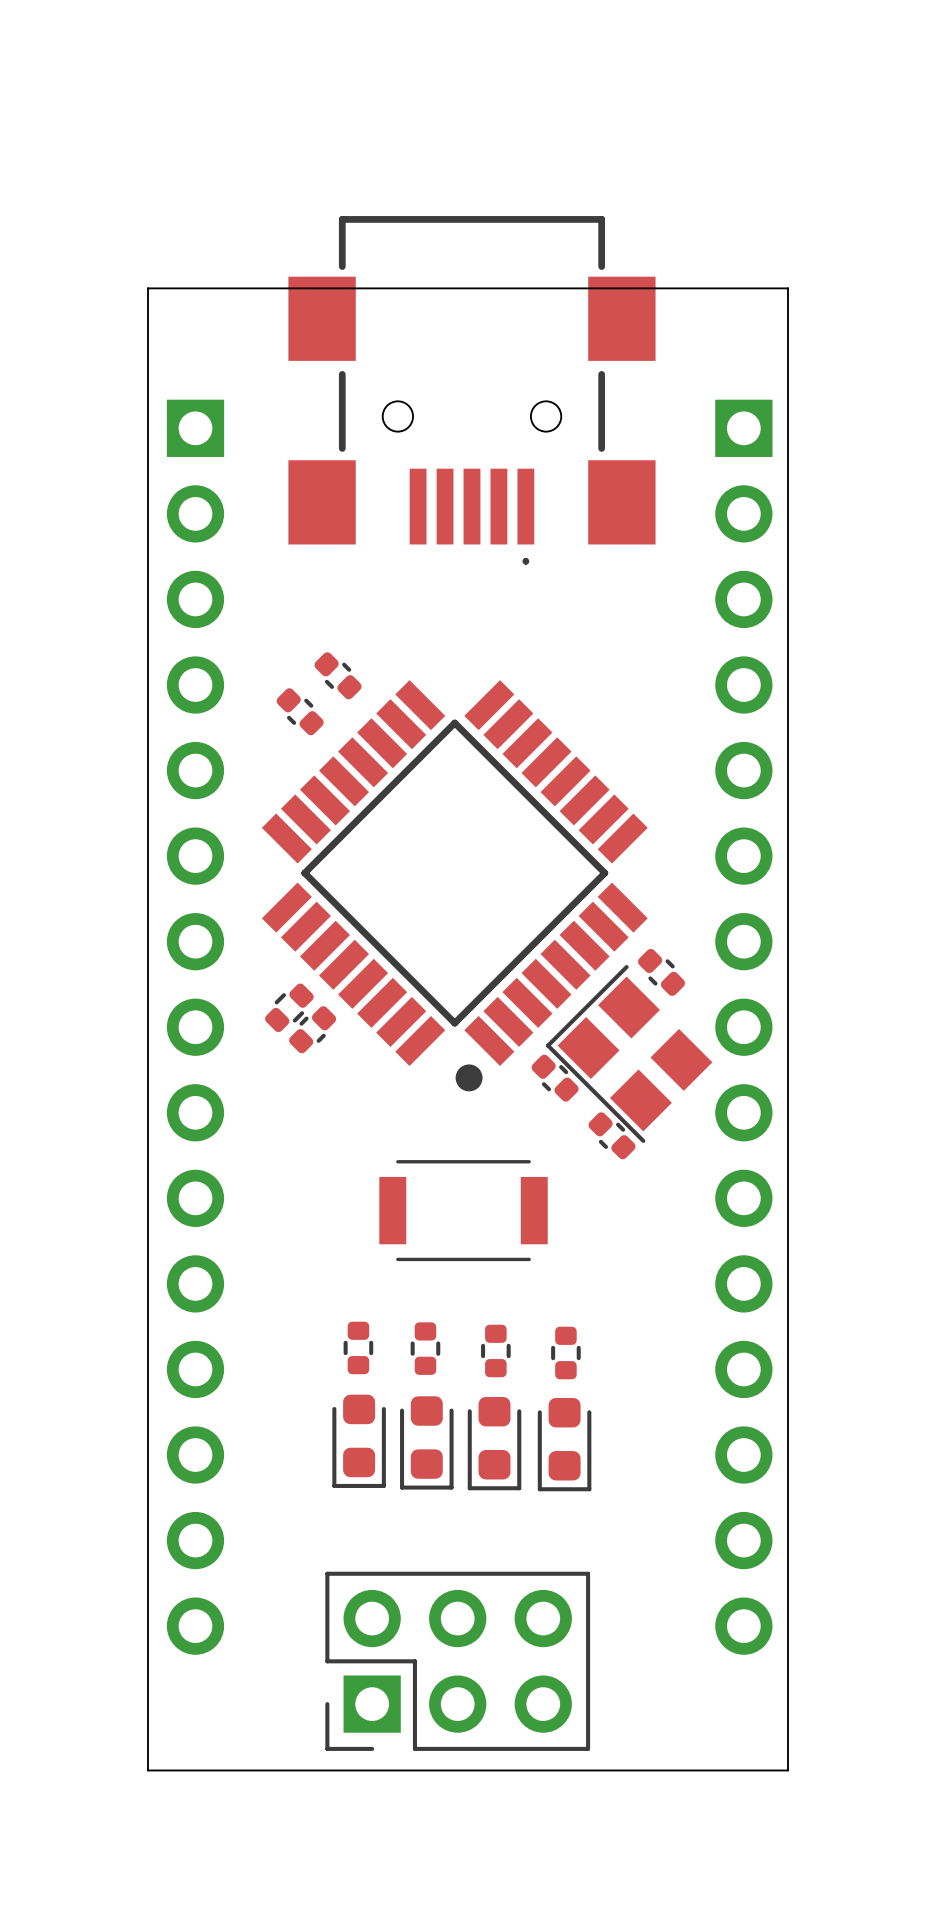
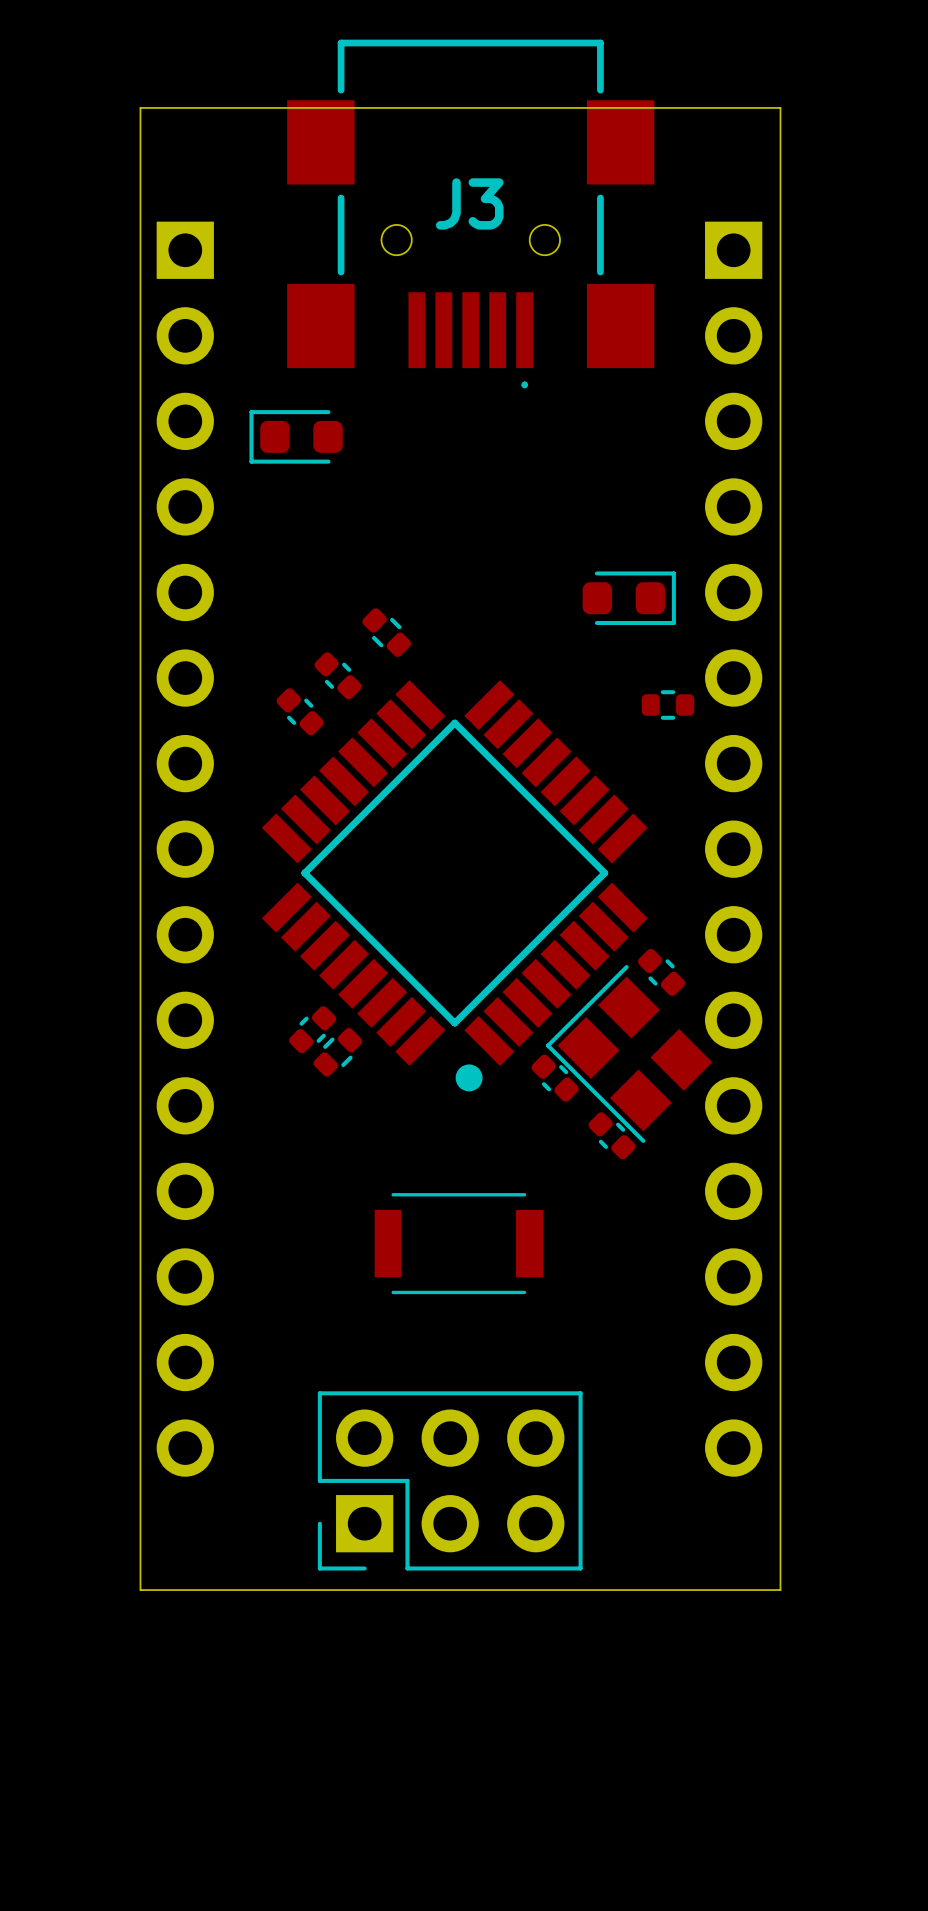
J3: none -> (470, 213)
board edge: (147, 288) (787, 288) (787, 1770) (147, 1770) (147, 288) -> (140, 107) (780, 107) (780, 1590) (140, 1590) (140, 107)
part: (471, 390) -> none
part: none -> (296, 436)
part: none -> (629, 598)
part: none -> (386, 632)
part: none -> (667, 705)
part position: (289, 1007) -> (337, 1052)
part position: (195, 1027) -> (185, 849)
part position: (743, 1027) -> (733, 849)
part position: (463, 1210) -> (458, 1243)
part: (358, 1347) -> none
part: (425, 1348) -> none
part: (495, 1350) -> none
part: (565, 1353) -> none
part: (359, 1441) -> none
part: (426, 1442) -> none
part: (494, 1443) -> none
part: (564, 1444) -> none
part position: (457, 1661) -> (450, 1480)

